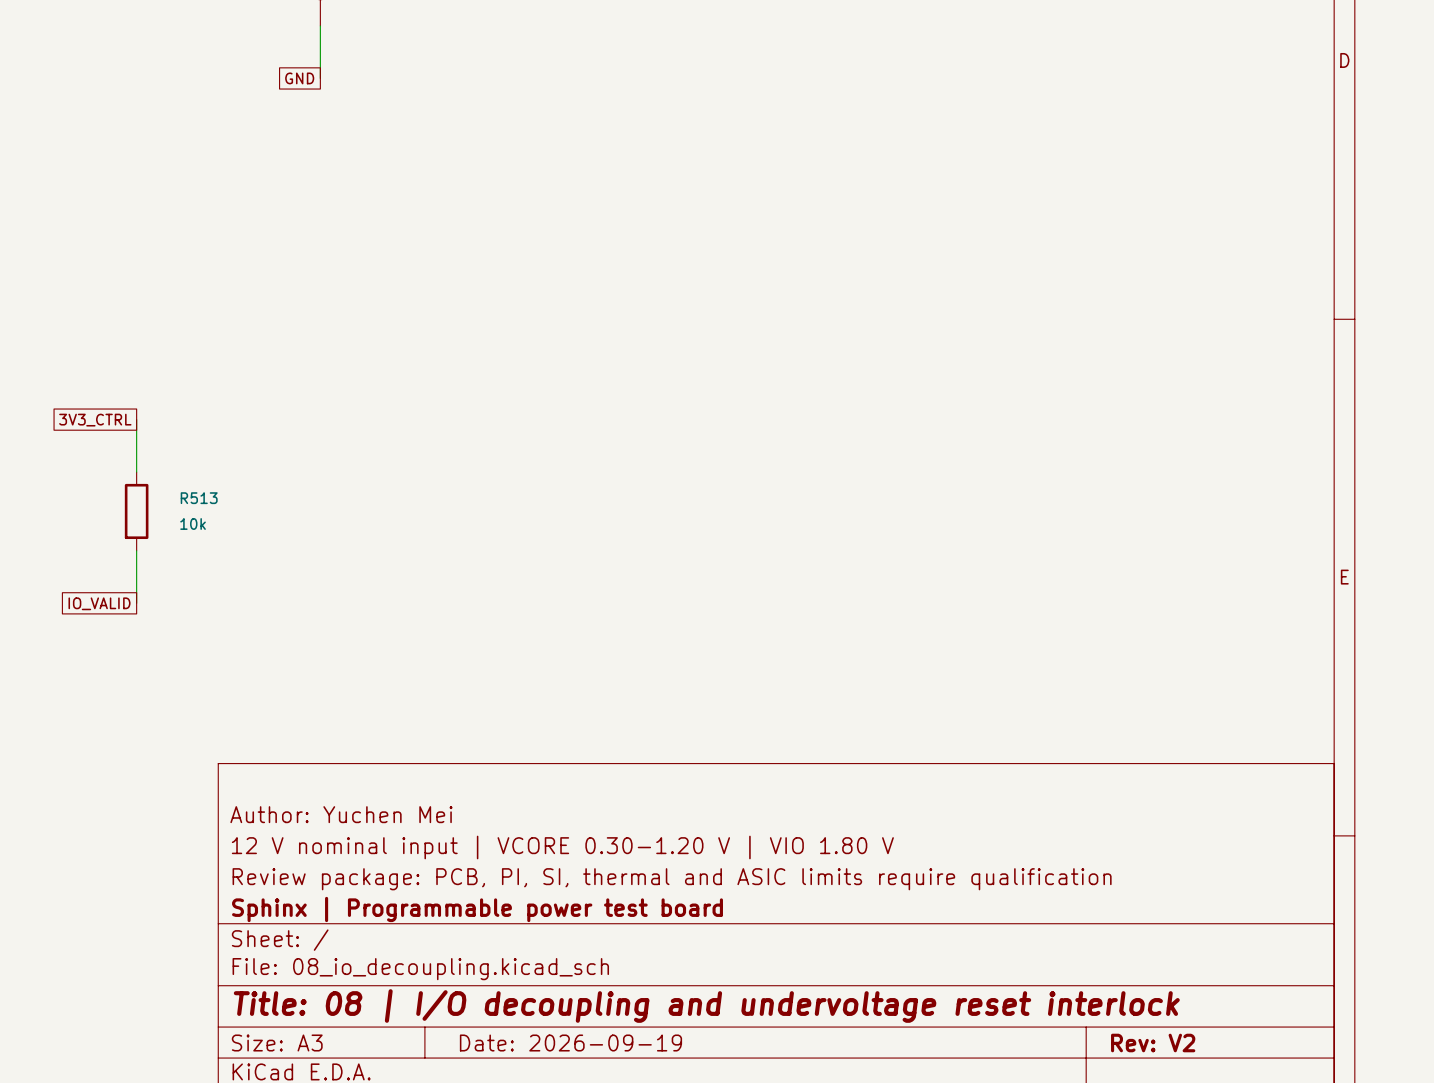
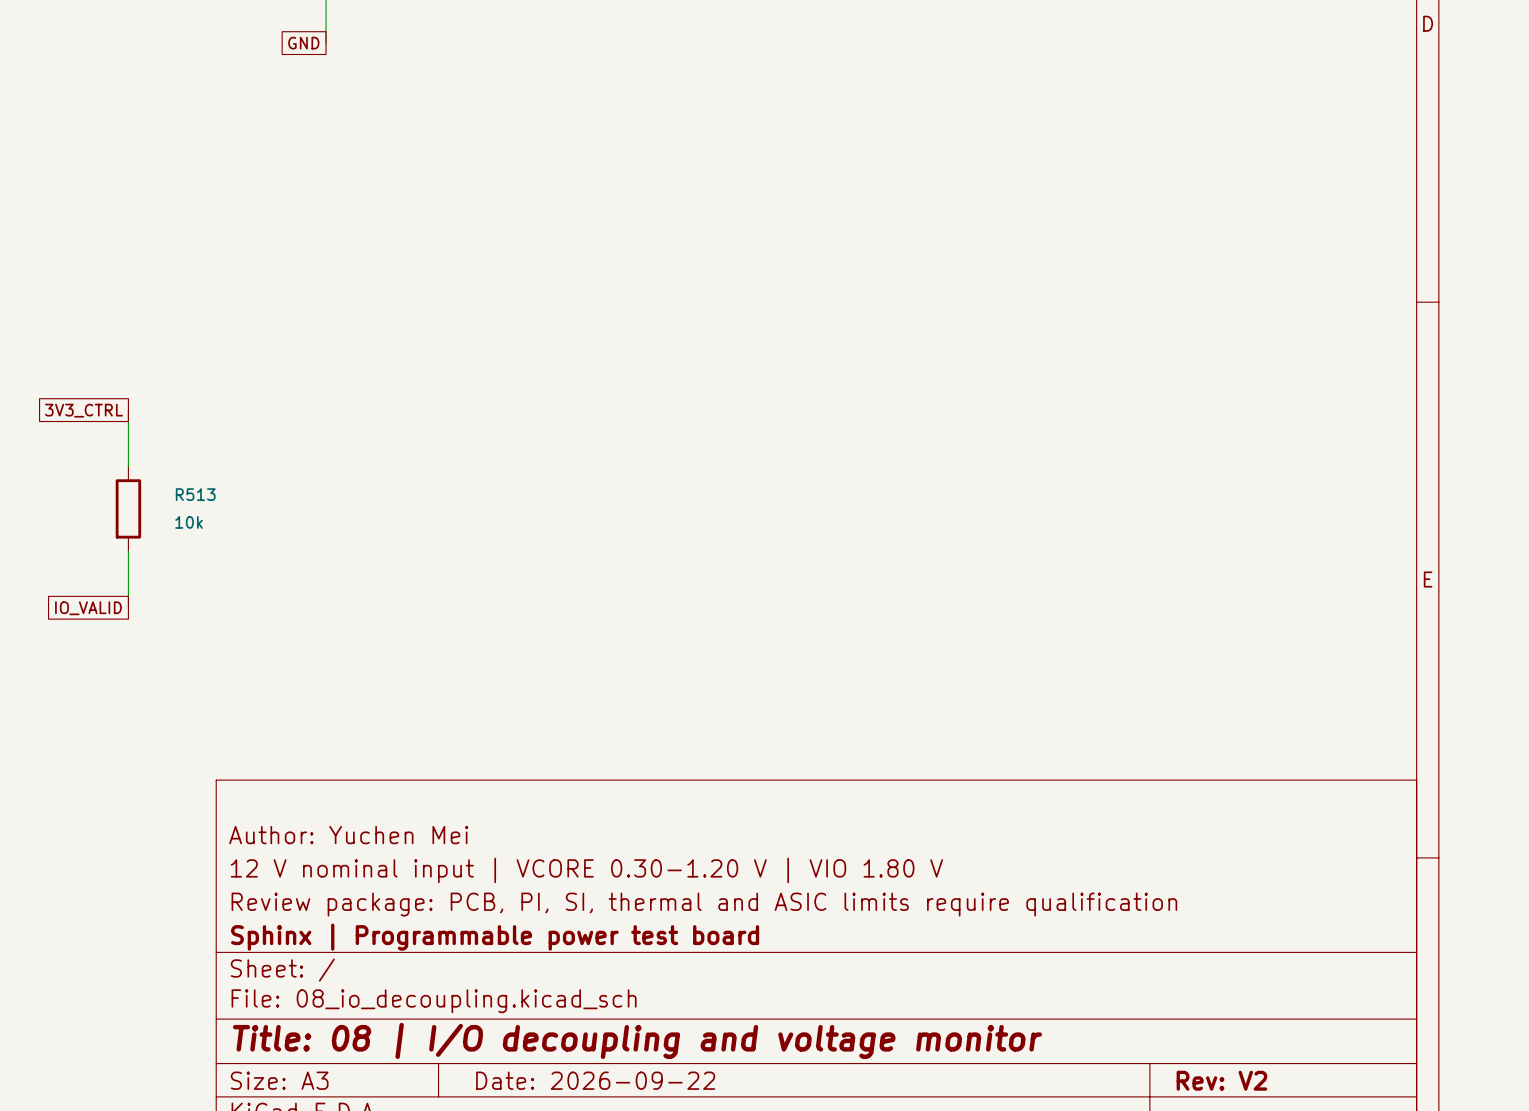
title block: Title: 08 | I/O decoupling and undervoltage reset interlock (706, 1006) -> Title: 08 | I/O decoupling and voltage monitor (637, 1040)
title block: Date: 2026-09-19 (570, 1043) -> Date: 2026-09-22 (595, 1080)

